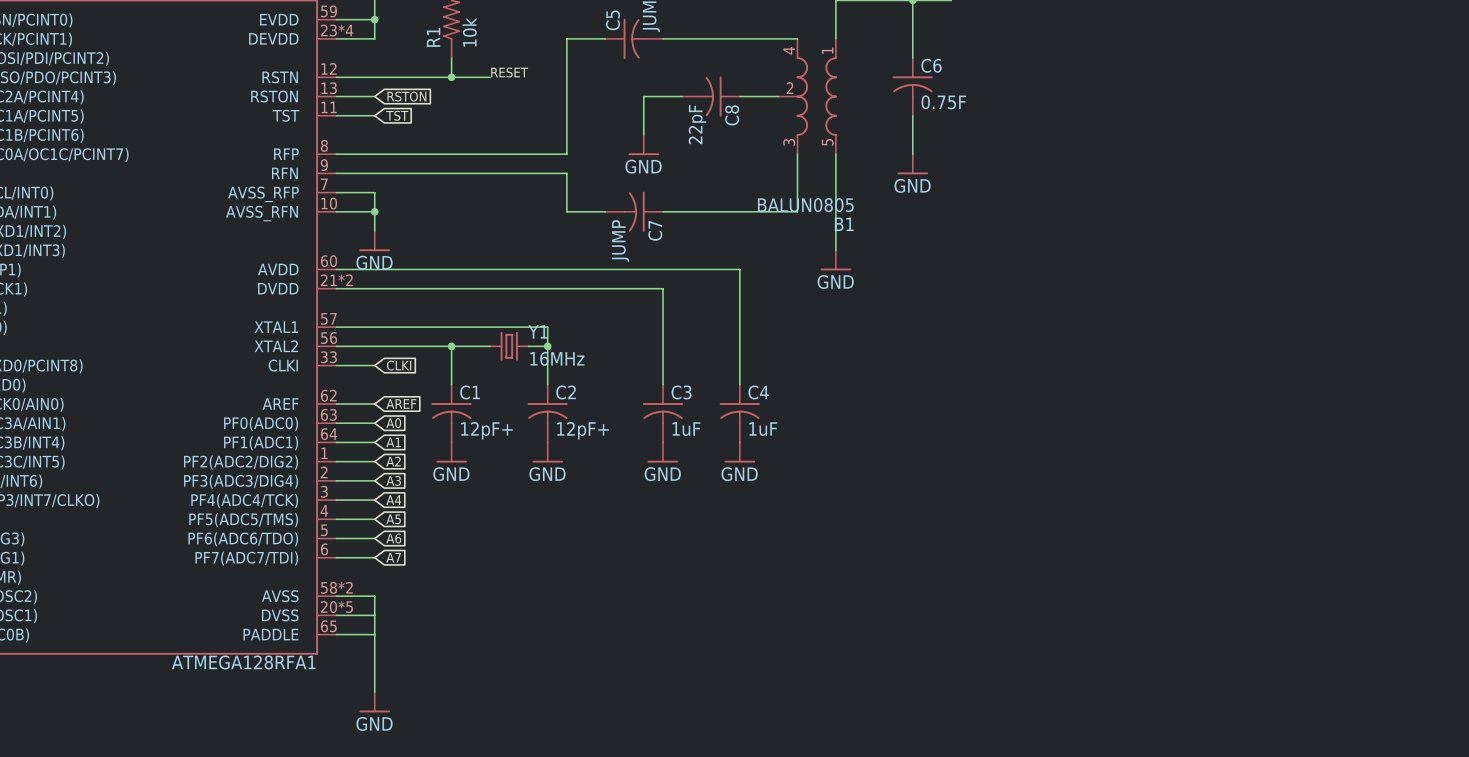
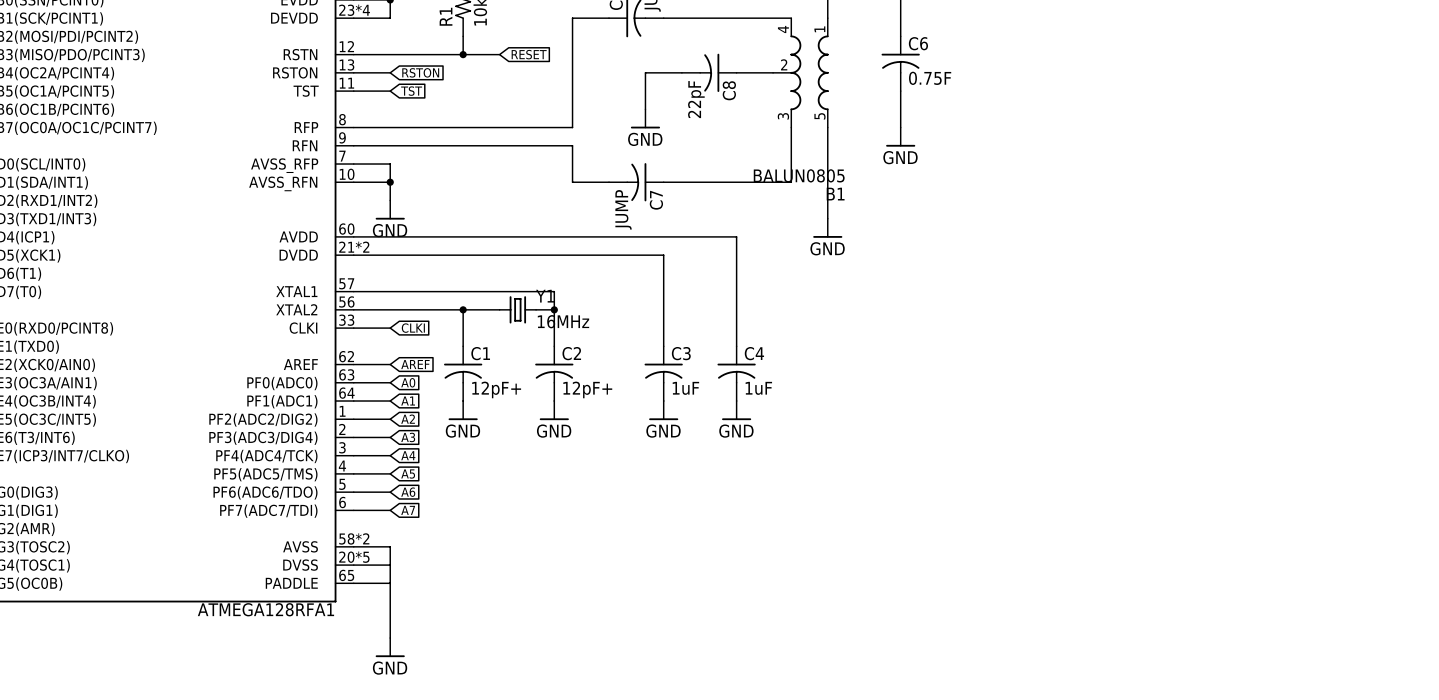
label: RESET (509, 72) -> none
global label: none -> RESET (529, 54)

